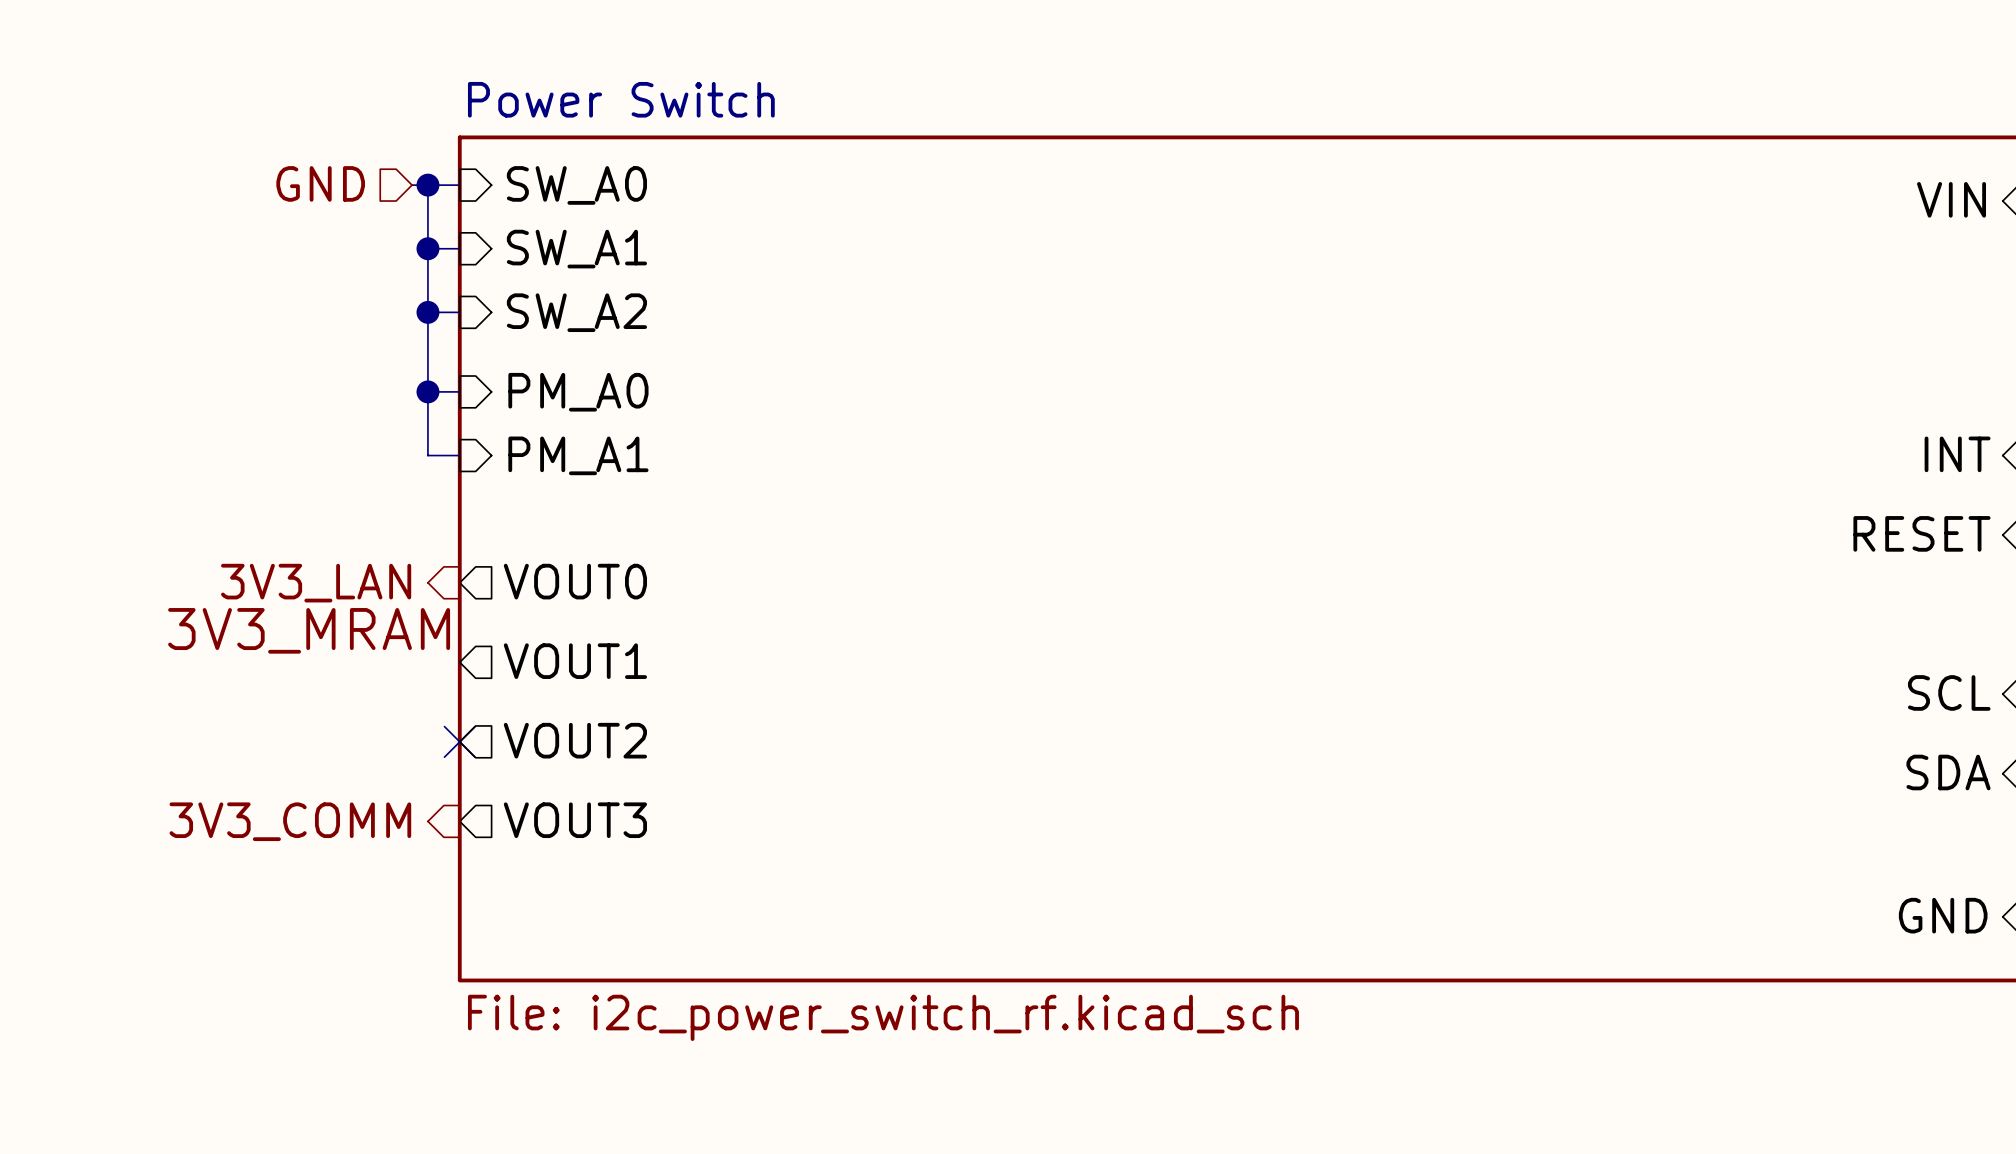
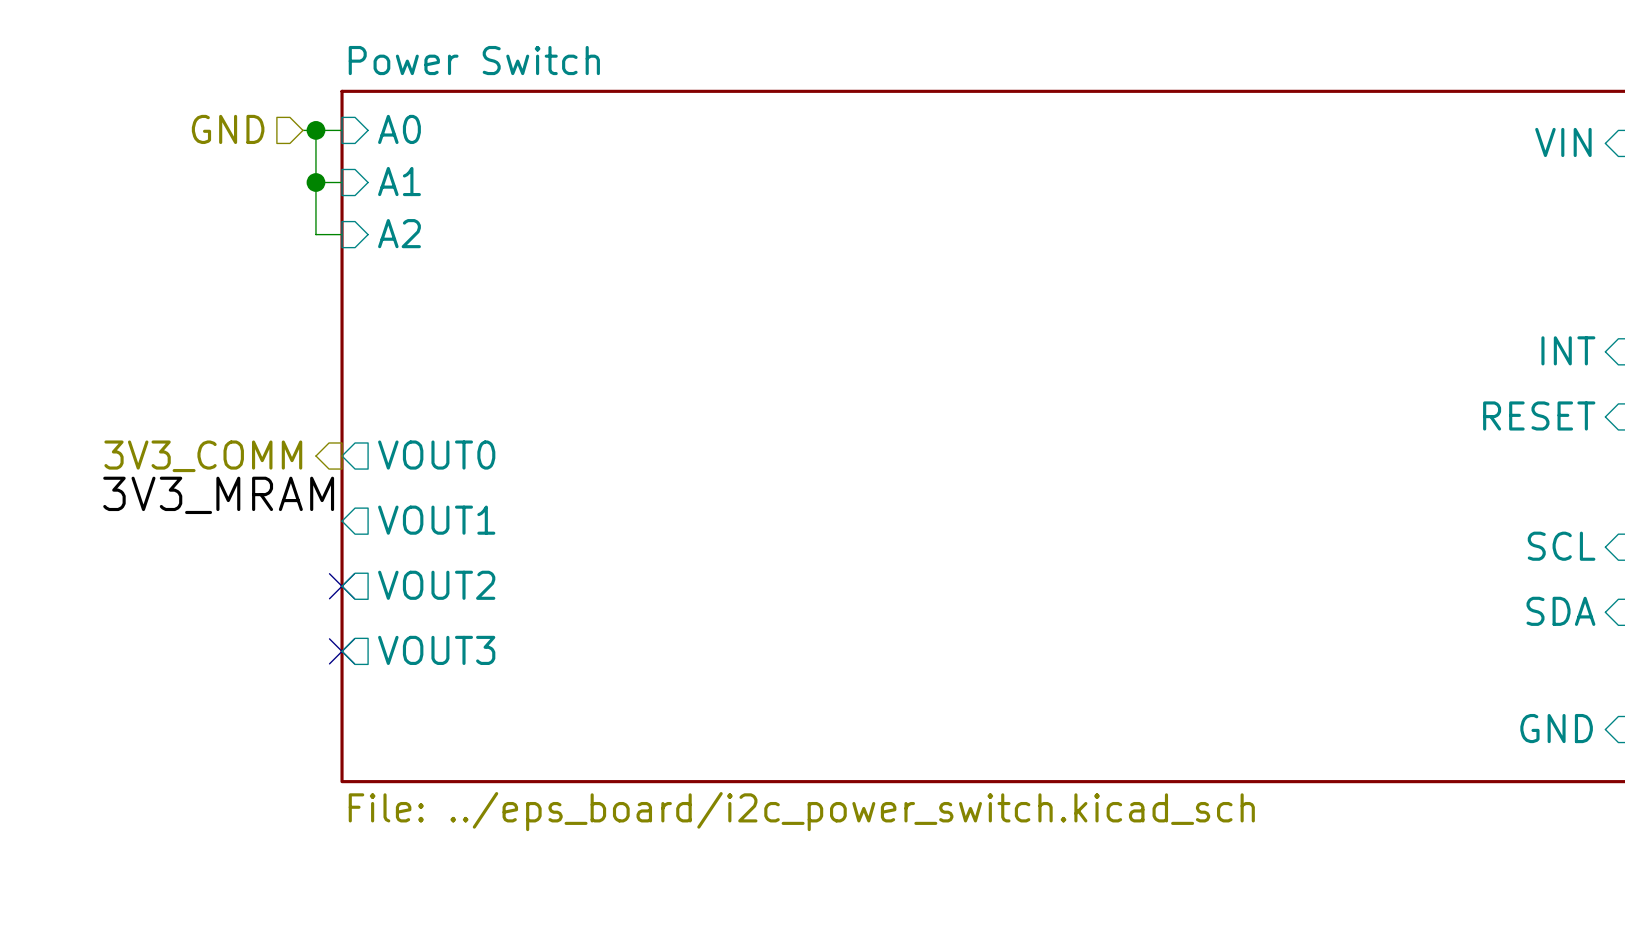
sheet pin: SW_A0 (576, 185) -> A0 (399, 129)
sheet pin: SW_A1 (576, 249) -> A1 (399, 181)
wire: (427, 312) (427, 455) (459, 455) -> none
junction: (427, 312) -> none
sheet pin: SW_A2 (576, 312) -> A2 (399, 233)
wire: (427, 391) (459, 391) -> none
junction: (427, 391) -> none
sheet pin: PM_A0 (578, 392) -> none
sheet pin: PM_A1 (578, 455) -> none
hierarchical label: 3V3_LAN (316, 583) -> 3V3_COMM (203, 456)
hierarchical label: 3V3_COMM (290, 821) -> none
no-connect mark: none -> (342, 651)
sheet Power Switch value: File: i2c_power_switch_rf.kicad_sch (883, 1017) -> File: ../eps_board/i2c_power_switch.kicad_sch (801, 811)

